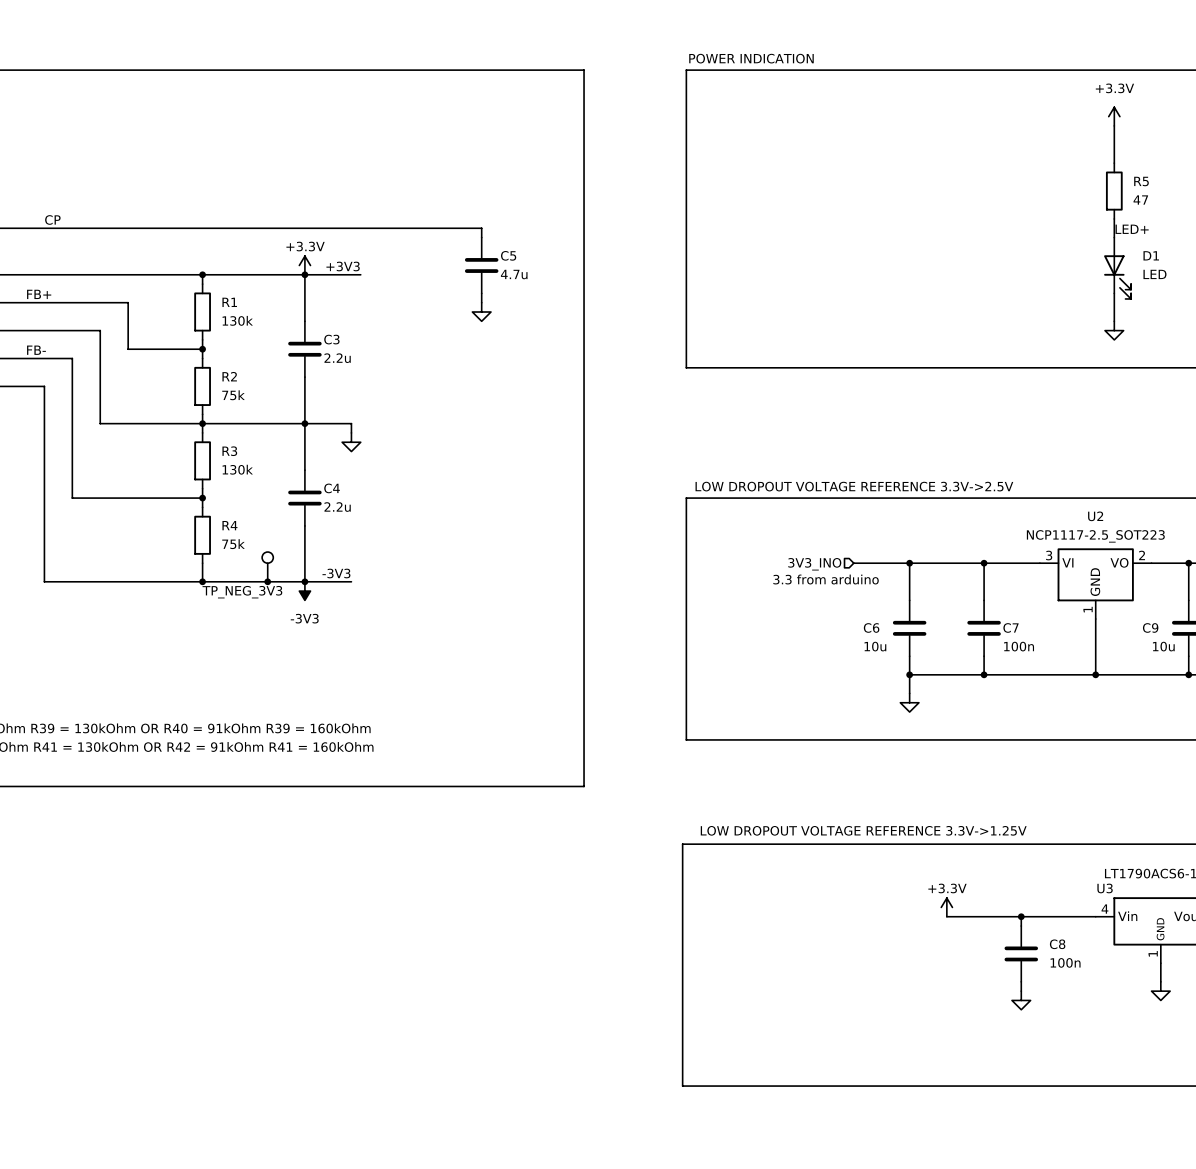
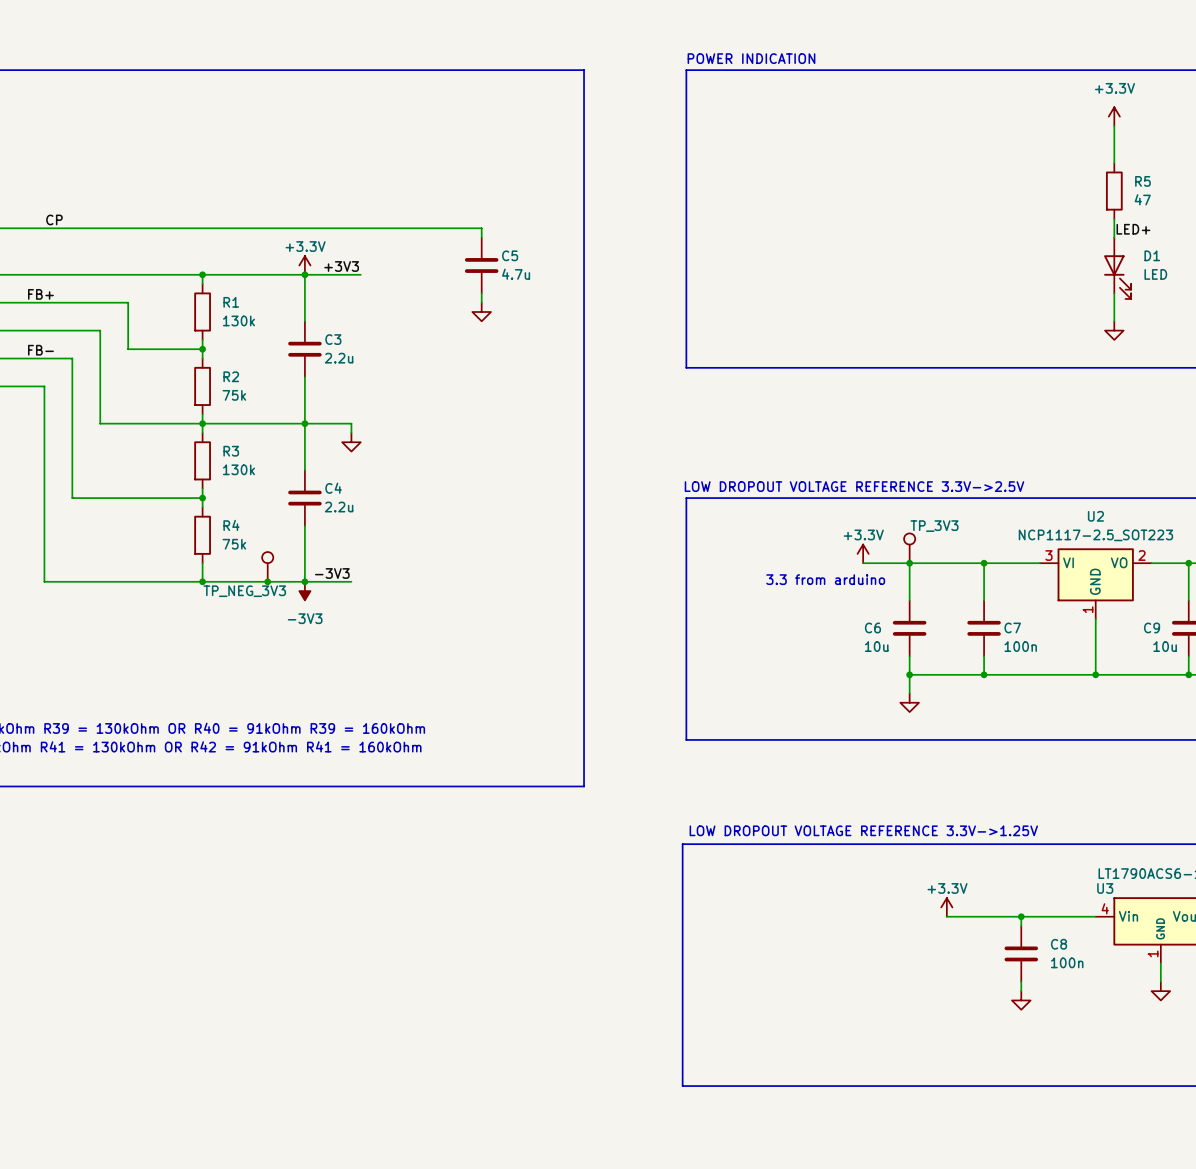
TP_3V3: none -> (909, 548)
power symbol: none -> +3.3V (863, 553)
wire: (853, 563) (863, 563) -> none
hierarchical label: 3V3_INO (814, 564) -> none

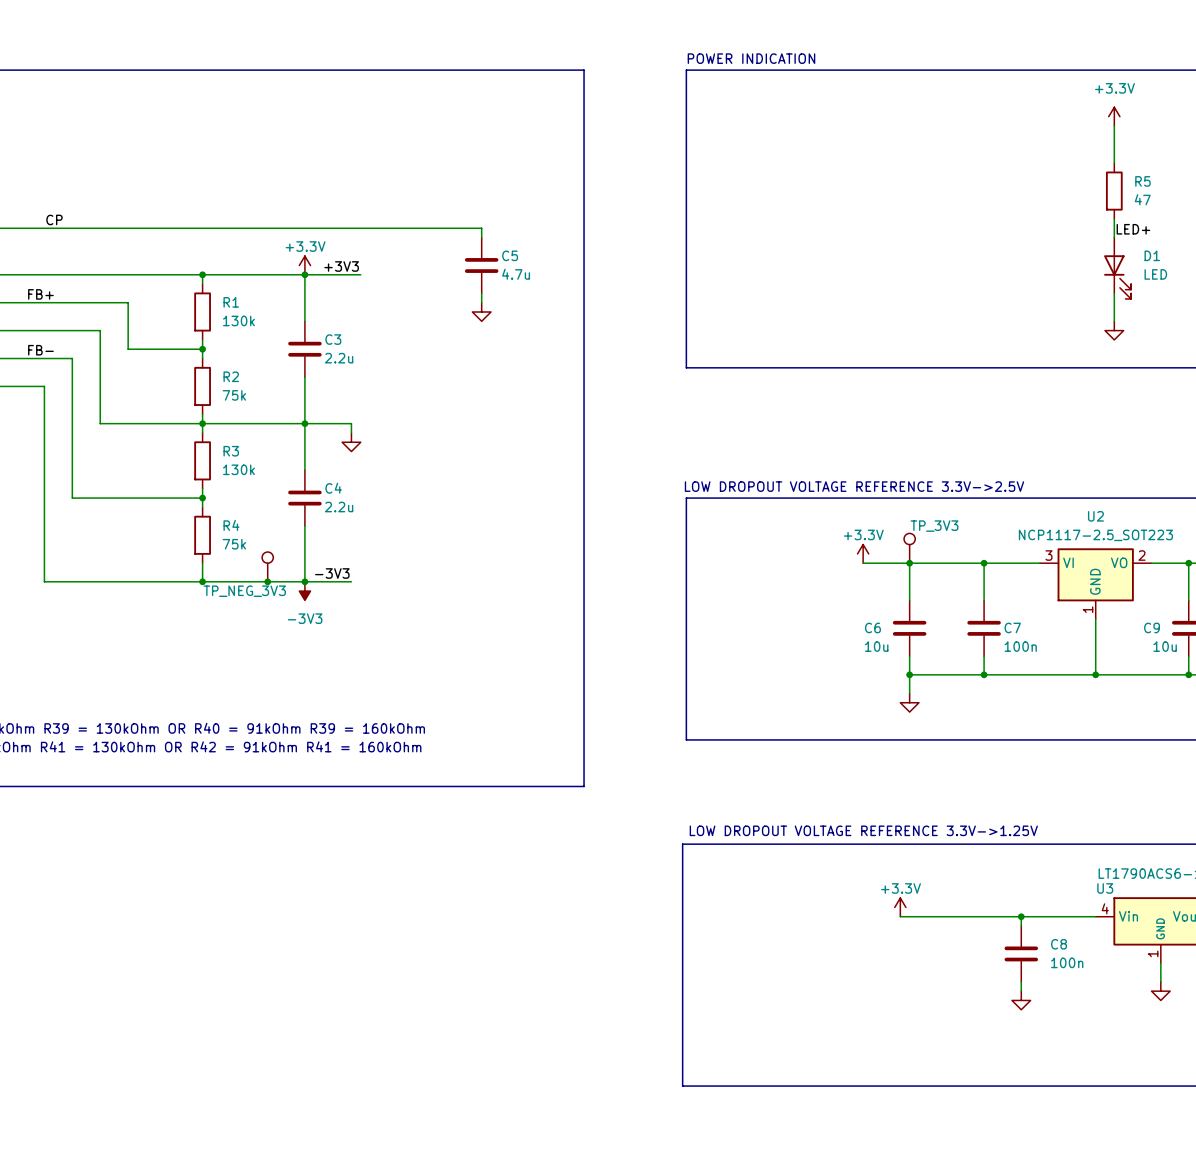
text: 3.3 from arduino (825, 579) -> none
power symbol position: +3.3V (946, 907) -> +3.3V (900, 907)
wire: none -> (900, 916) (946, 916)

